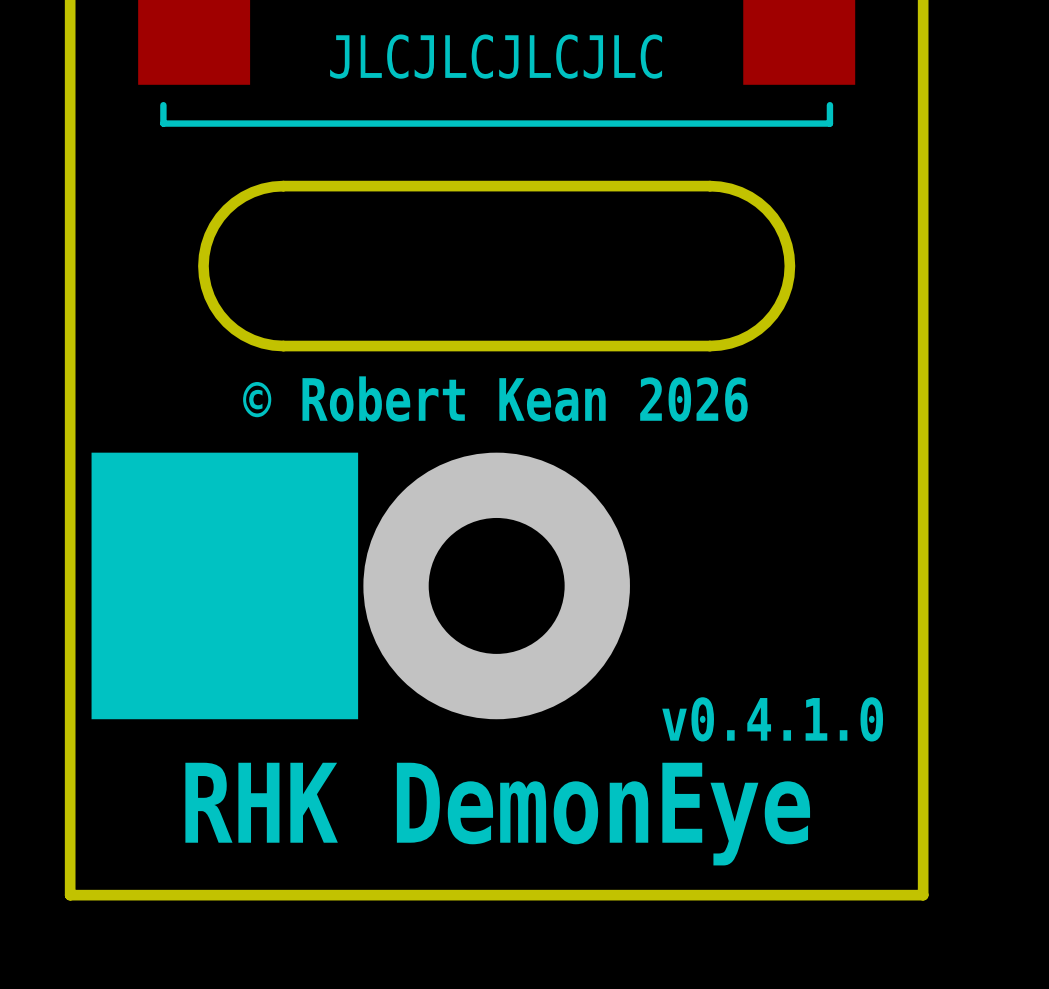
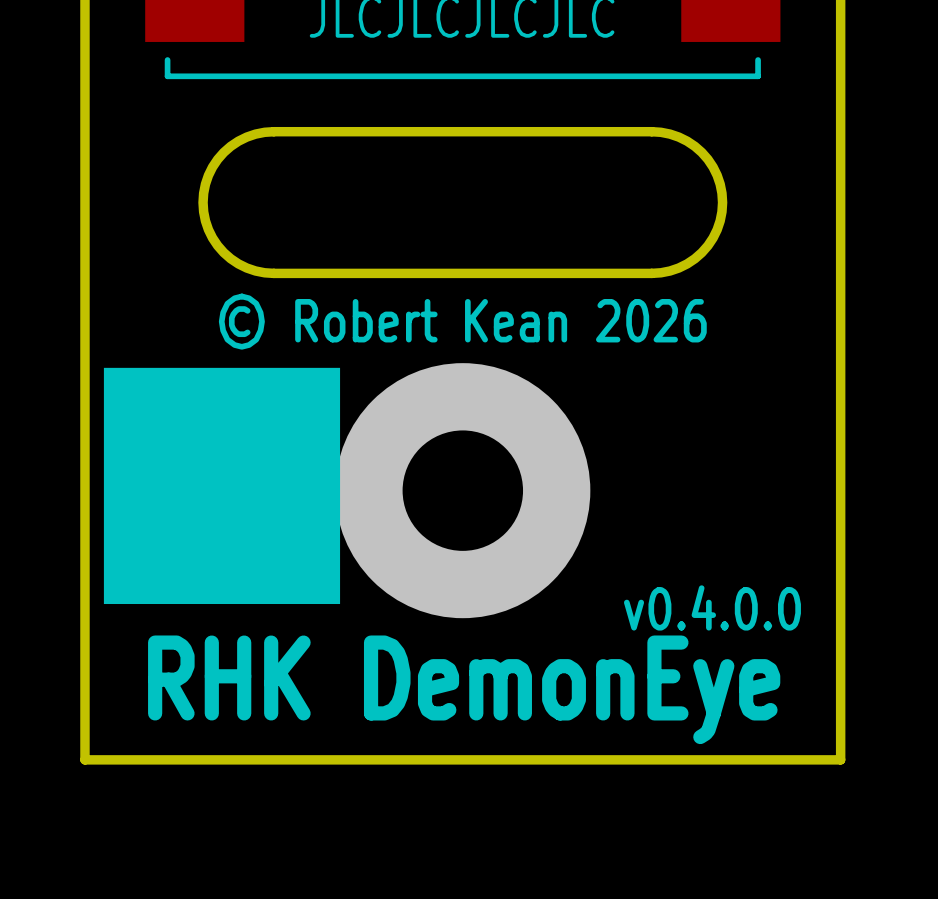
via size: [363, 452, 630, 720] -> [335, 363, 591, 619]
text: v0.4.1.0 (772, 719) -> v0.4.0.0 (712, 607)

